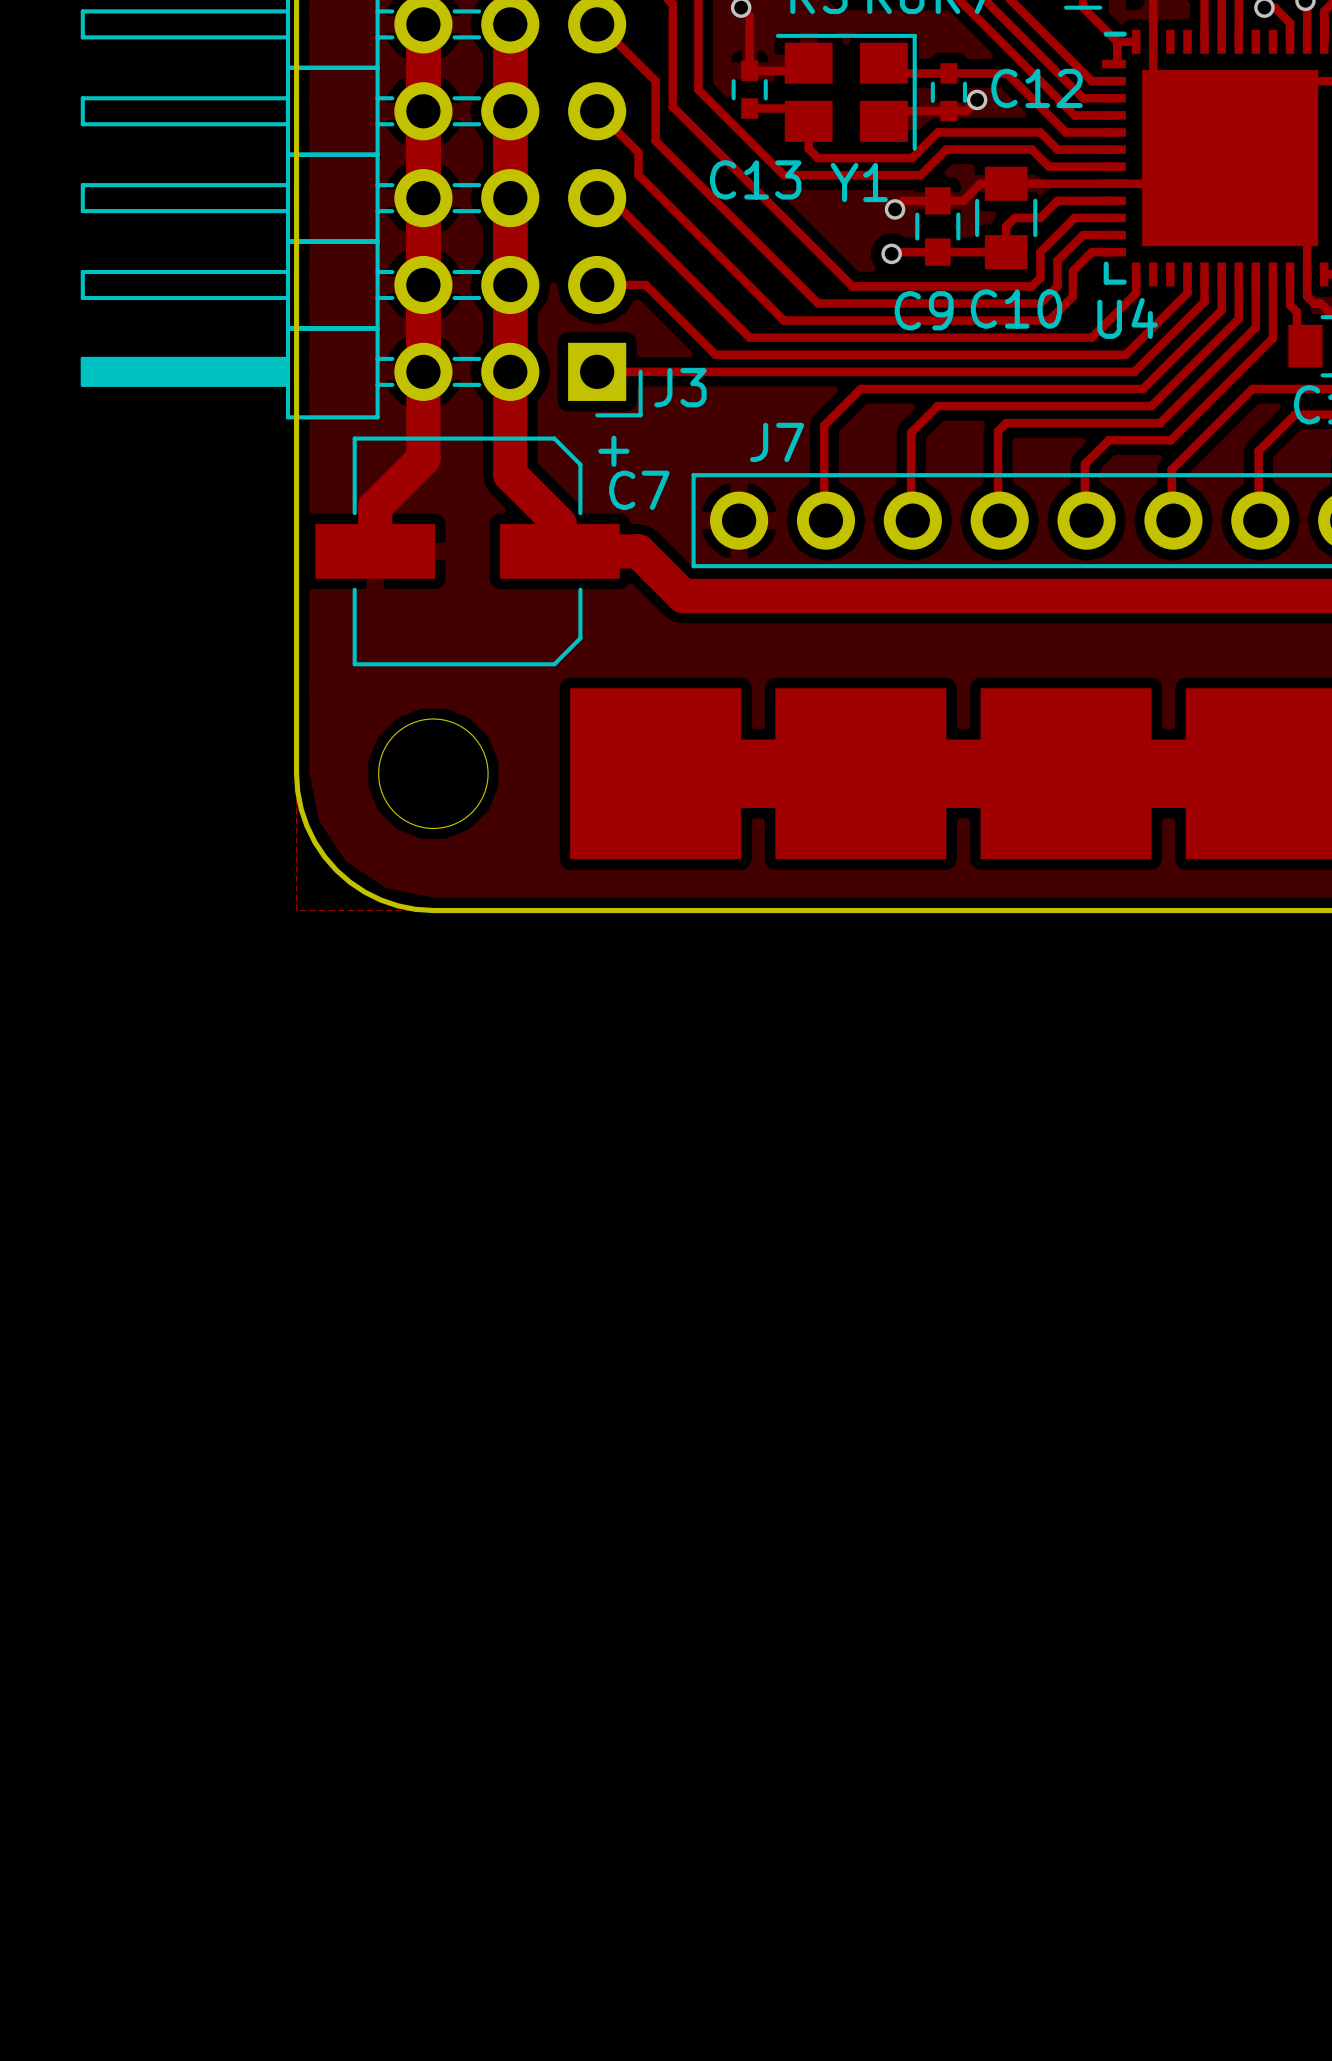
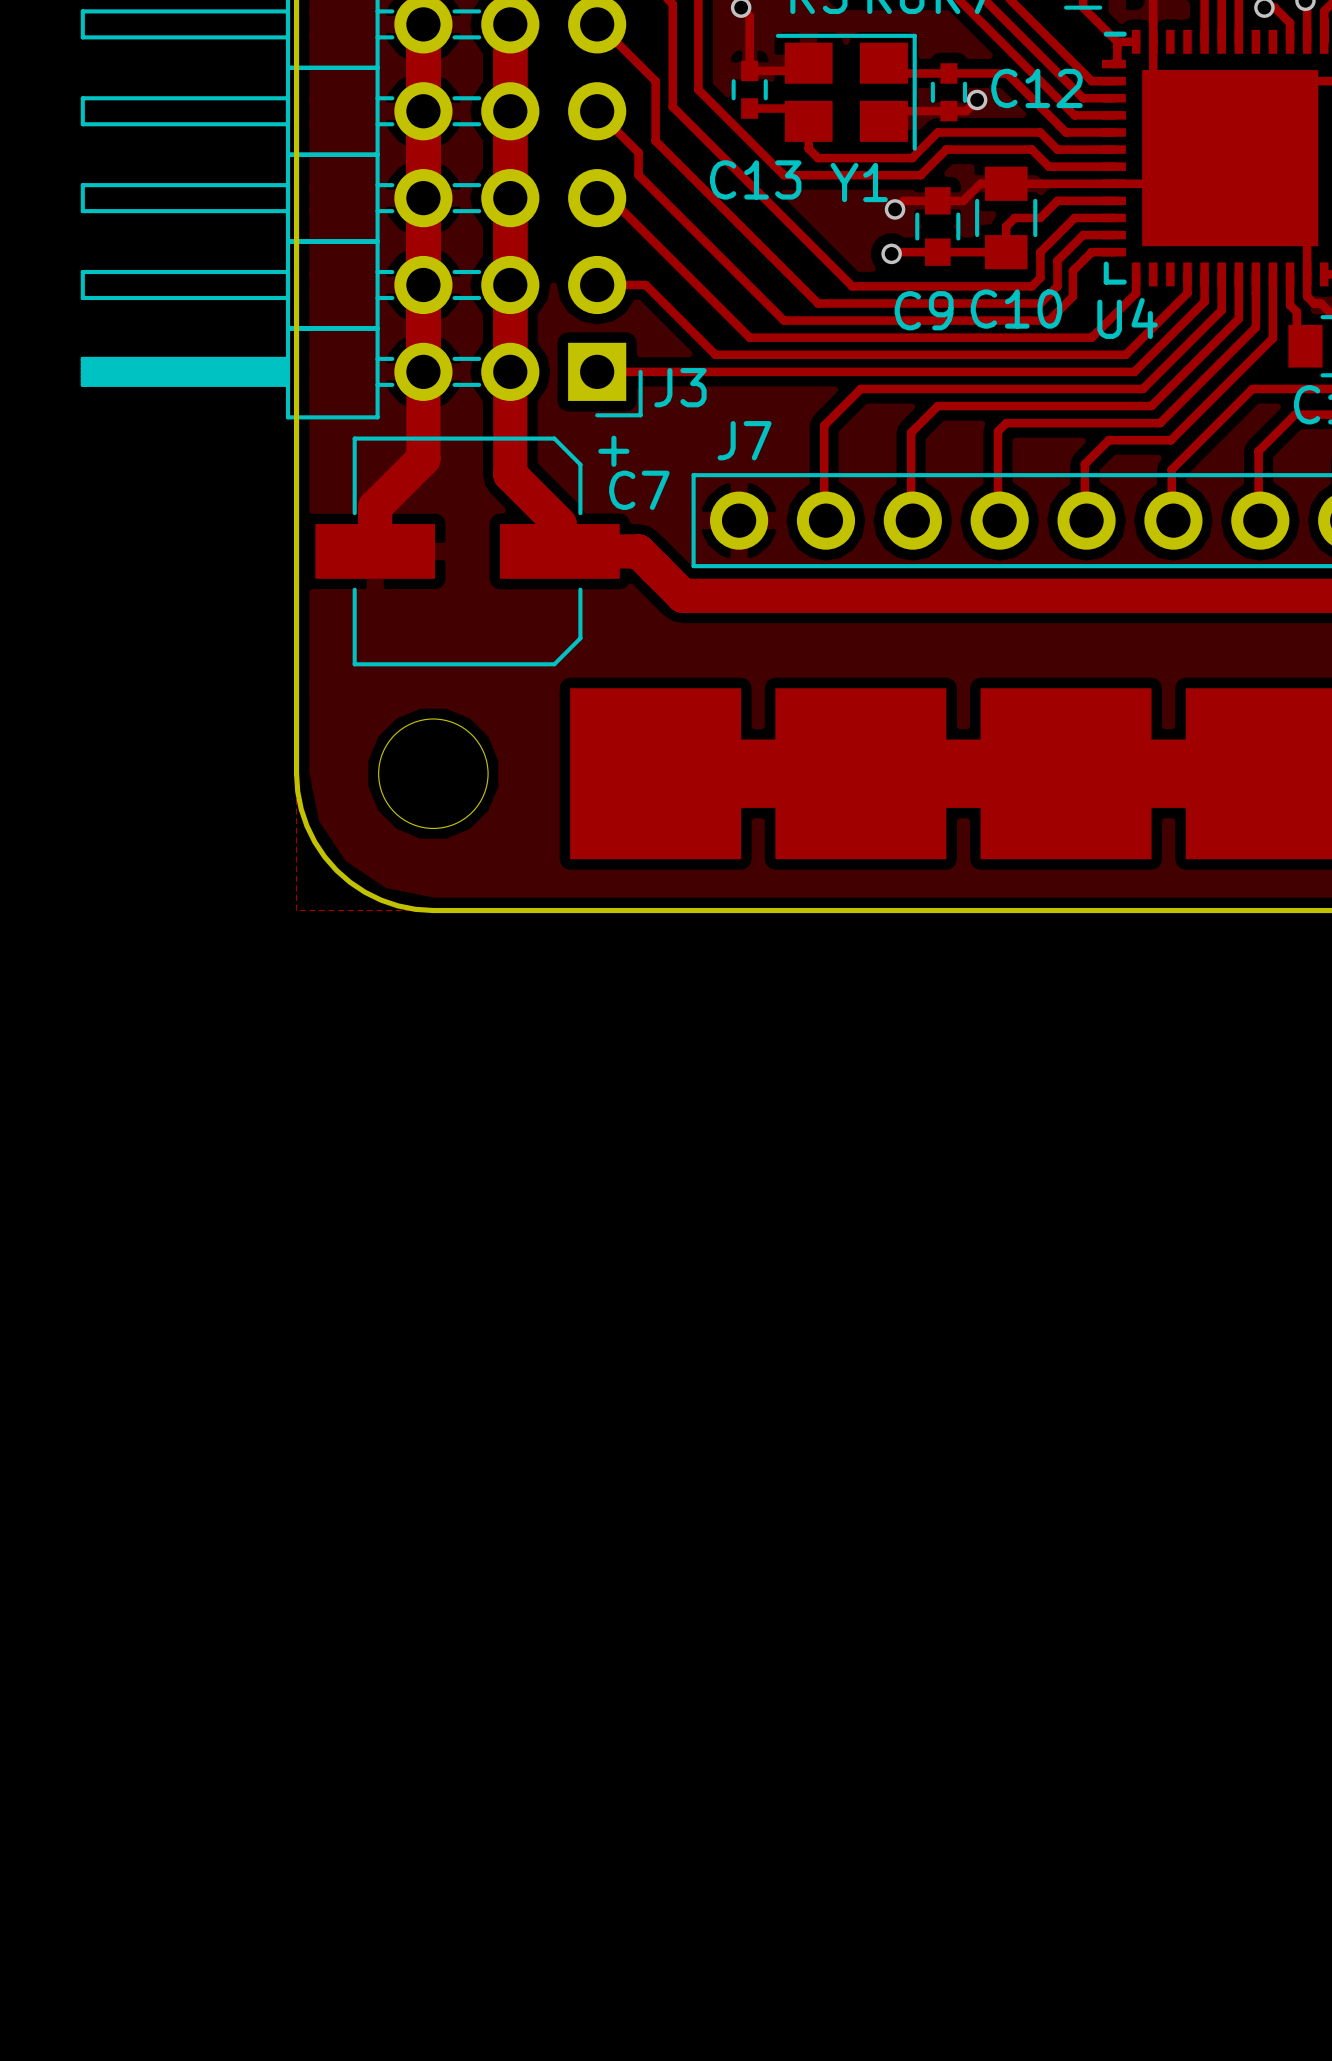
J7 name position: J7 (777, 442) -> J7 (744, 440)

